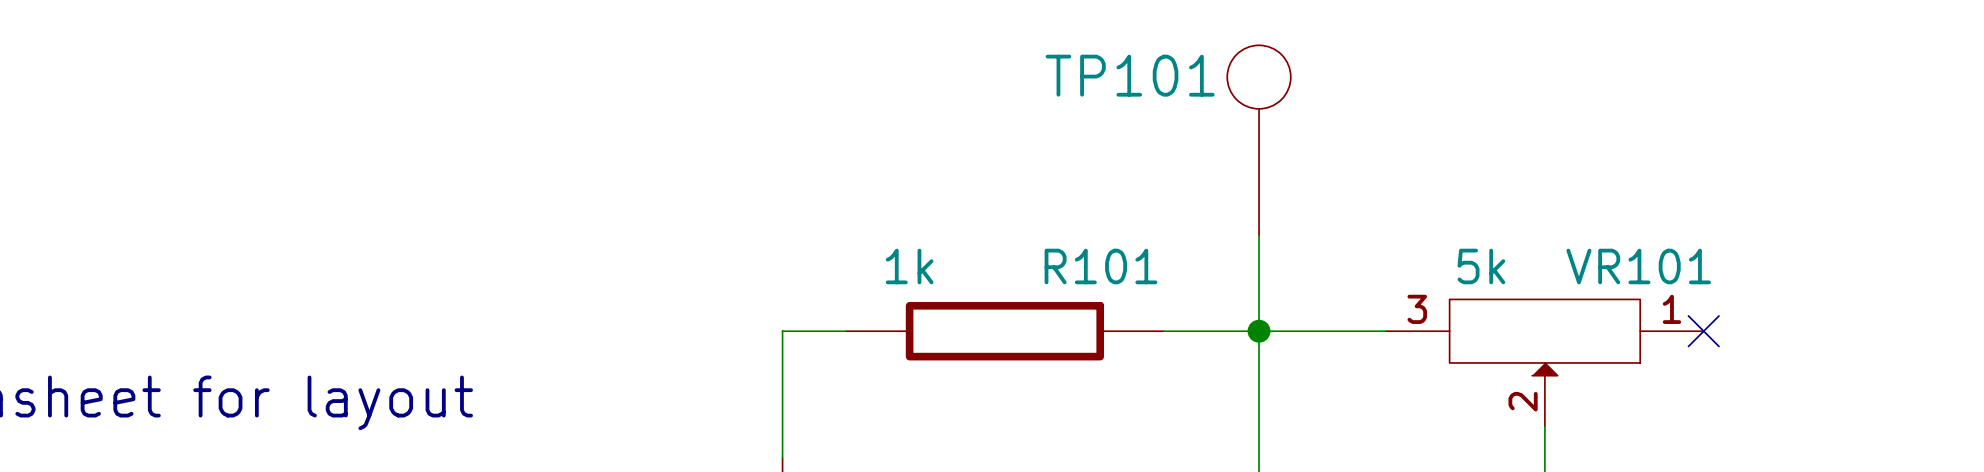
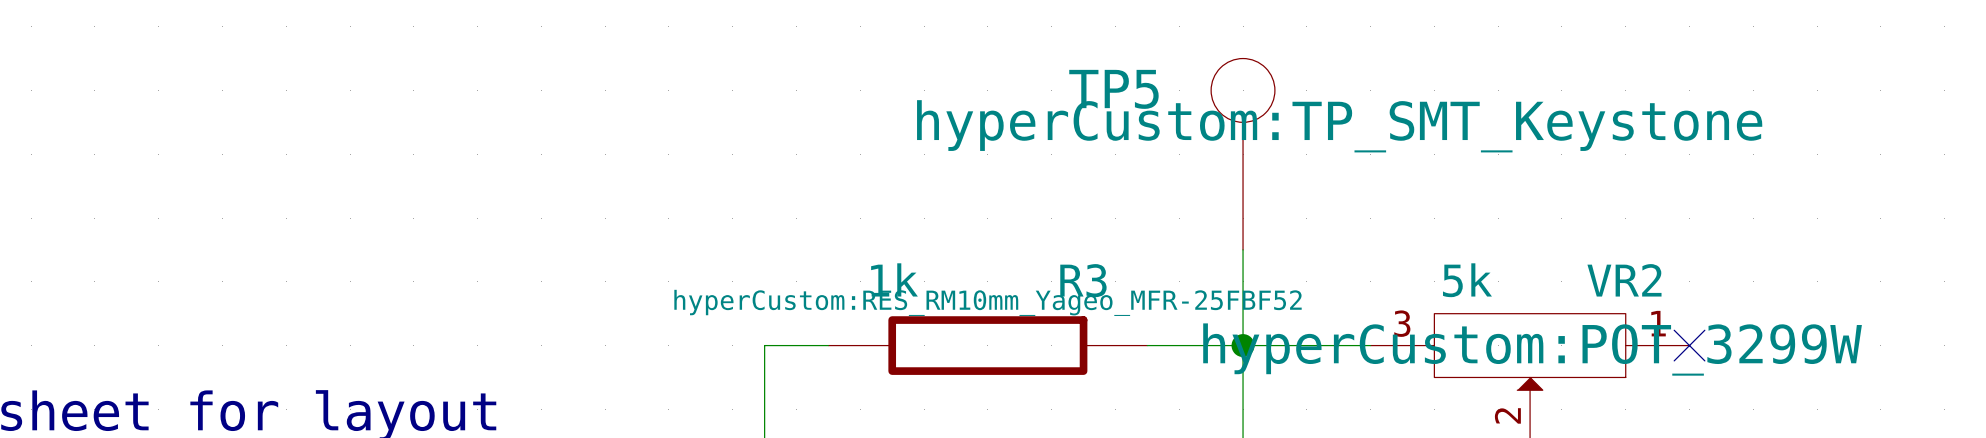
TP101 name: TP101 (1130, 75) -> TP5 (1113, 89)
TP101 text: none -> hyperCustom:TP_SMT_Keystone (1339, 126)
R101 name: R101 (1100, 266) -> R3 (1083, 280)
VR101 name: VR101 (1638, 266) -> VR2 (1624, 280)
R101 text: none -> hyperCustom:RES_RM10mm_Yageo_MFR-25FBF52 (988, 302)
VR101 text: none -> hyperCustom:POT_3299W (1532, 349)

